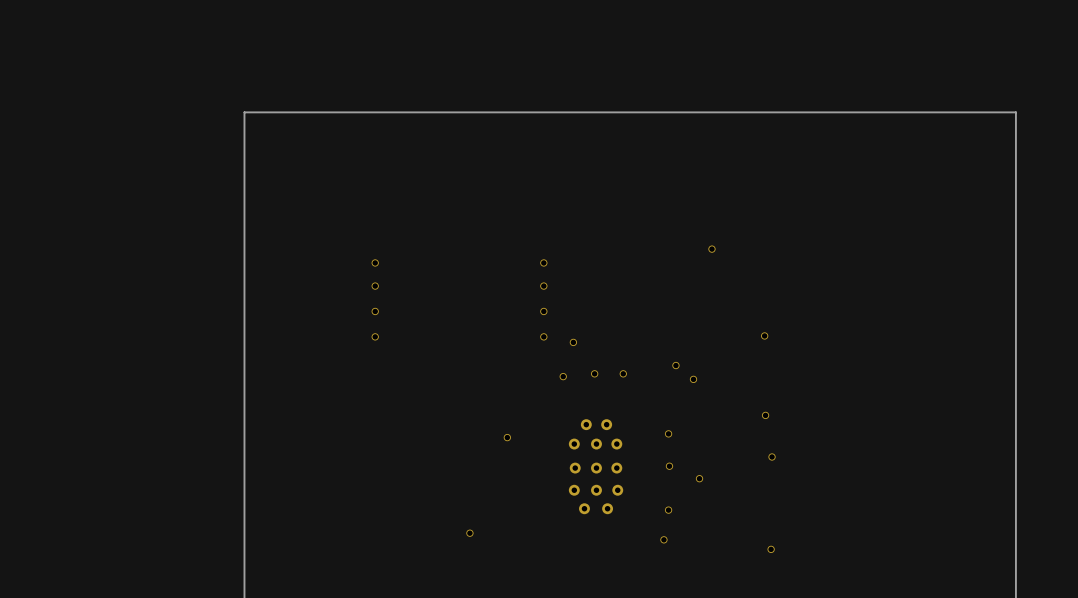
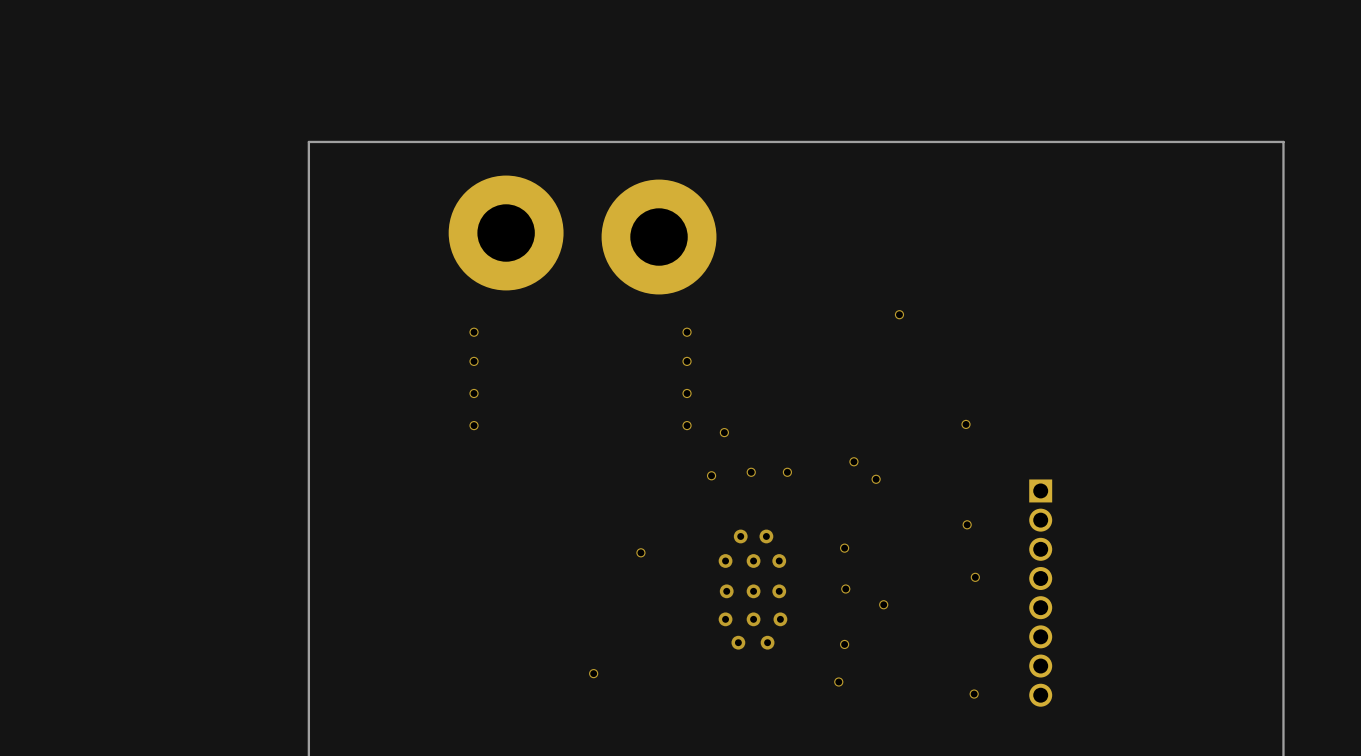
part: none -> (506, 233)
part: none -> (659, 237)
part: none -> (1040, 593)

